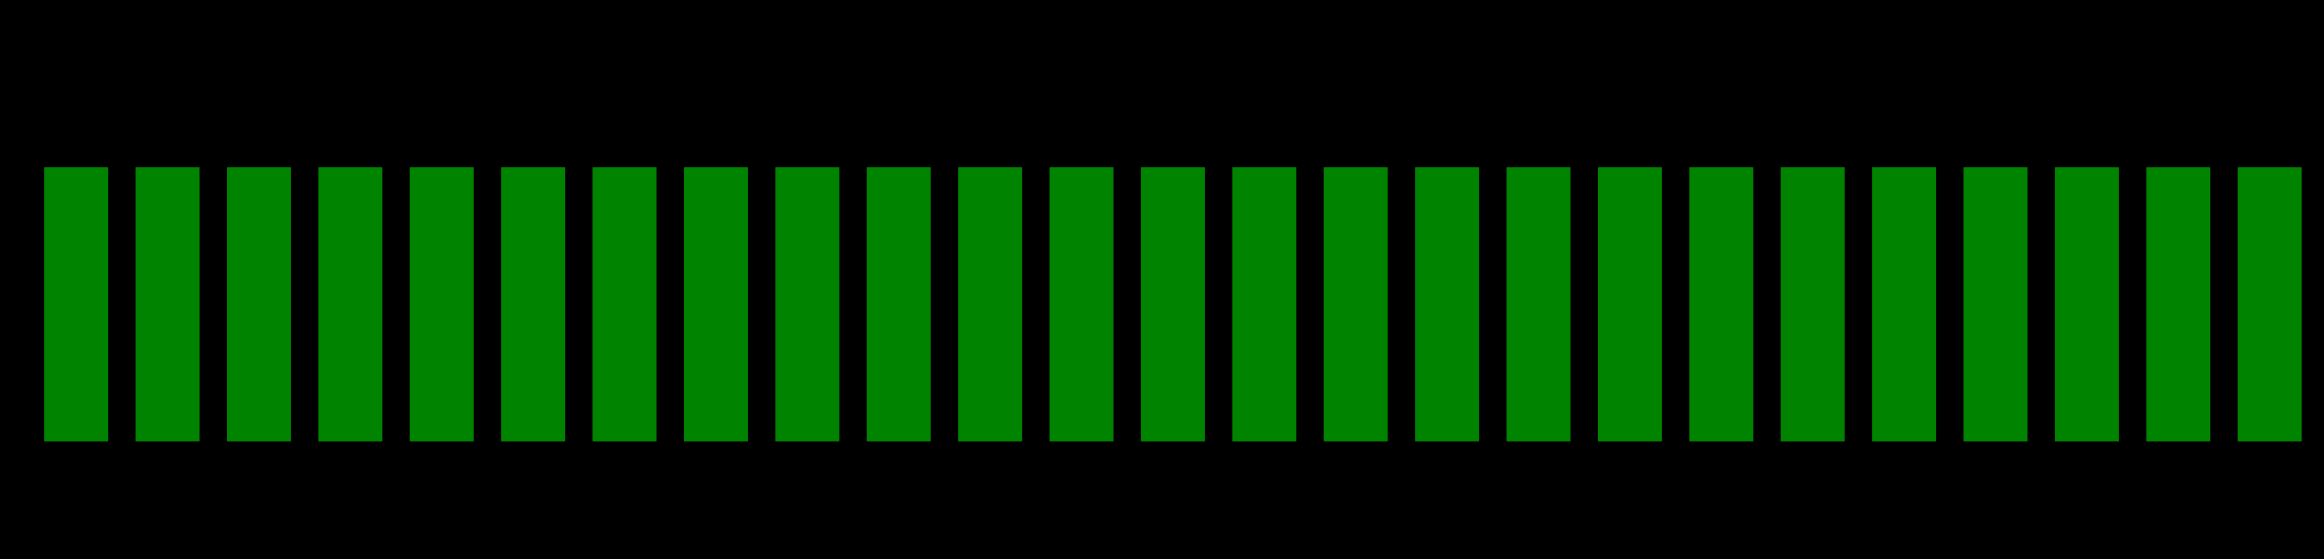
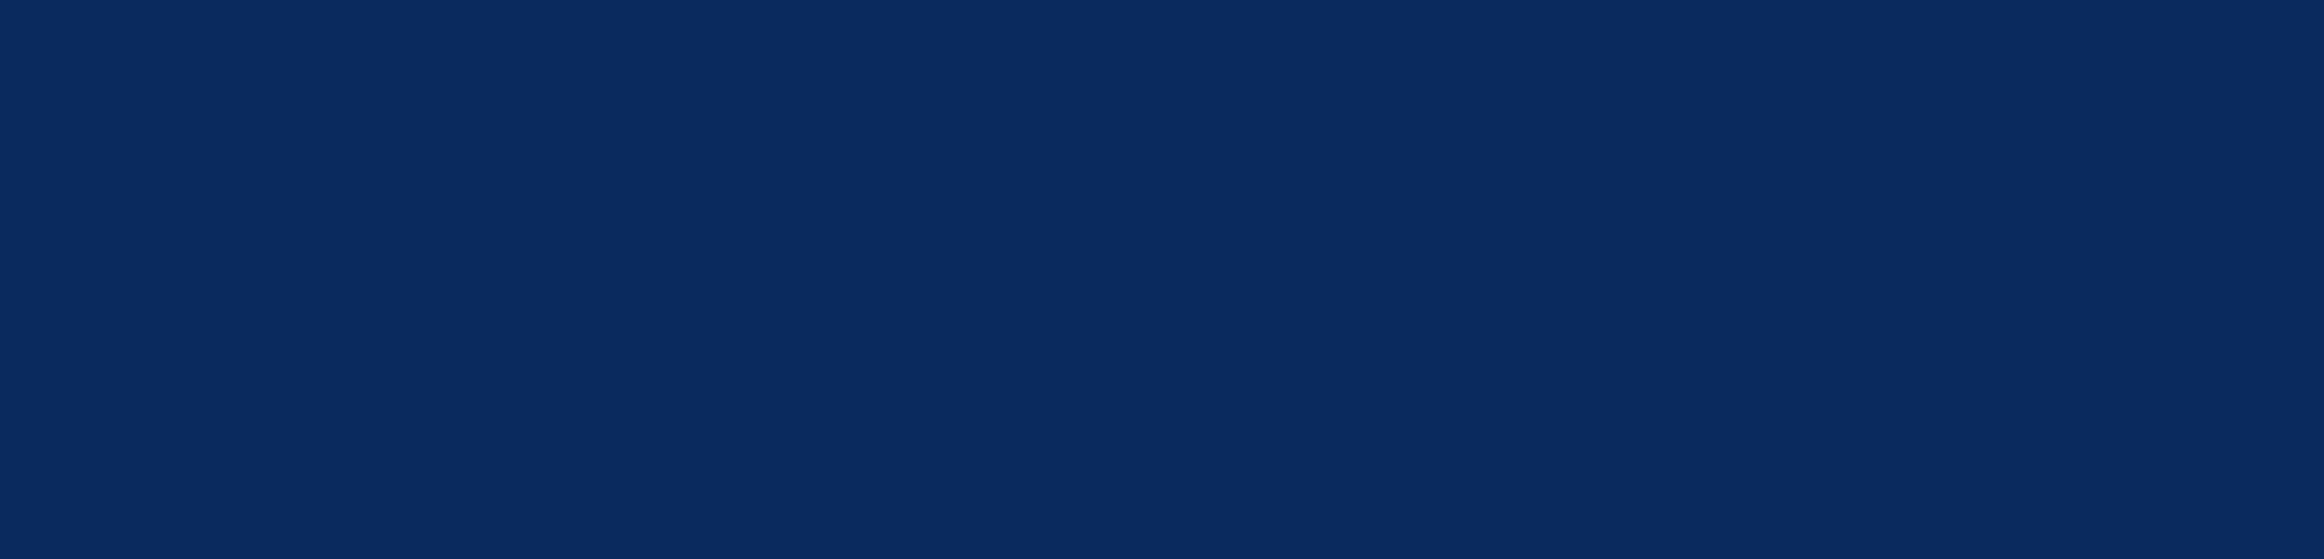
part: (1172, 304) -> none

